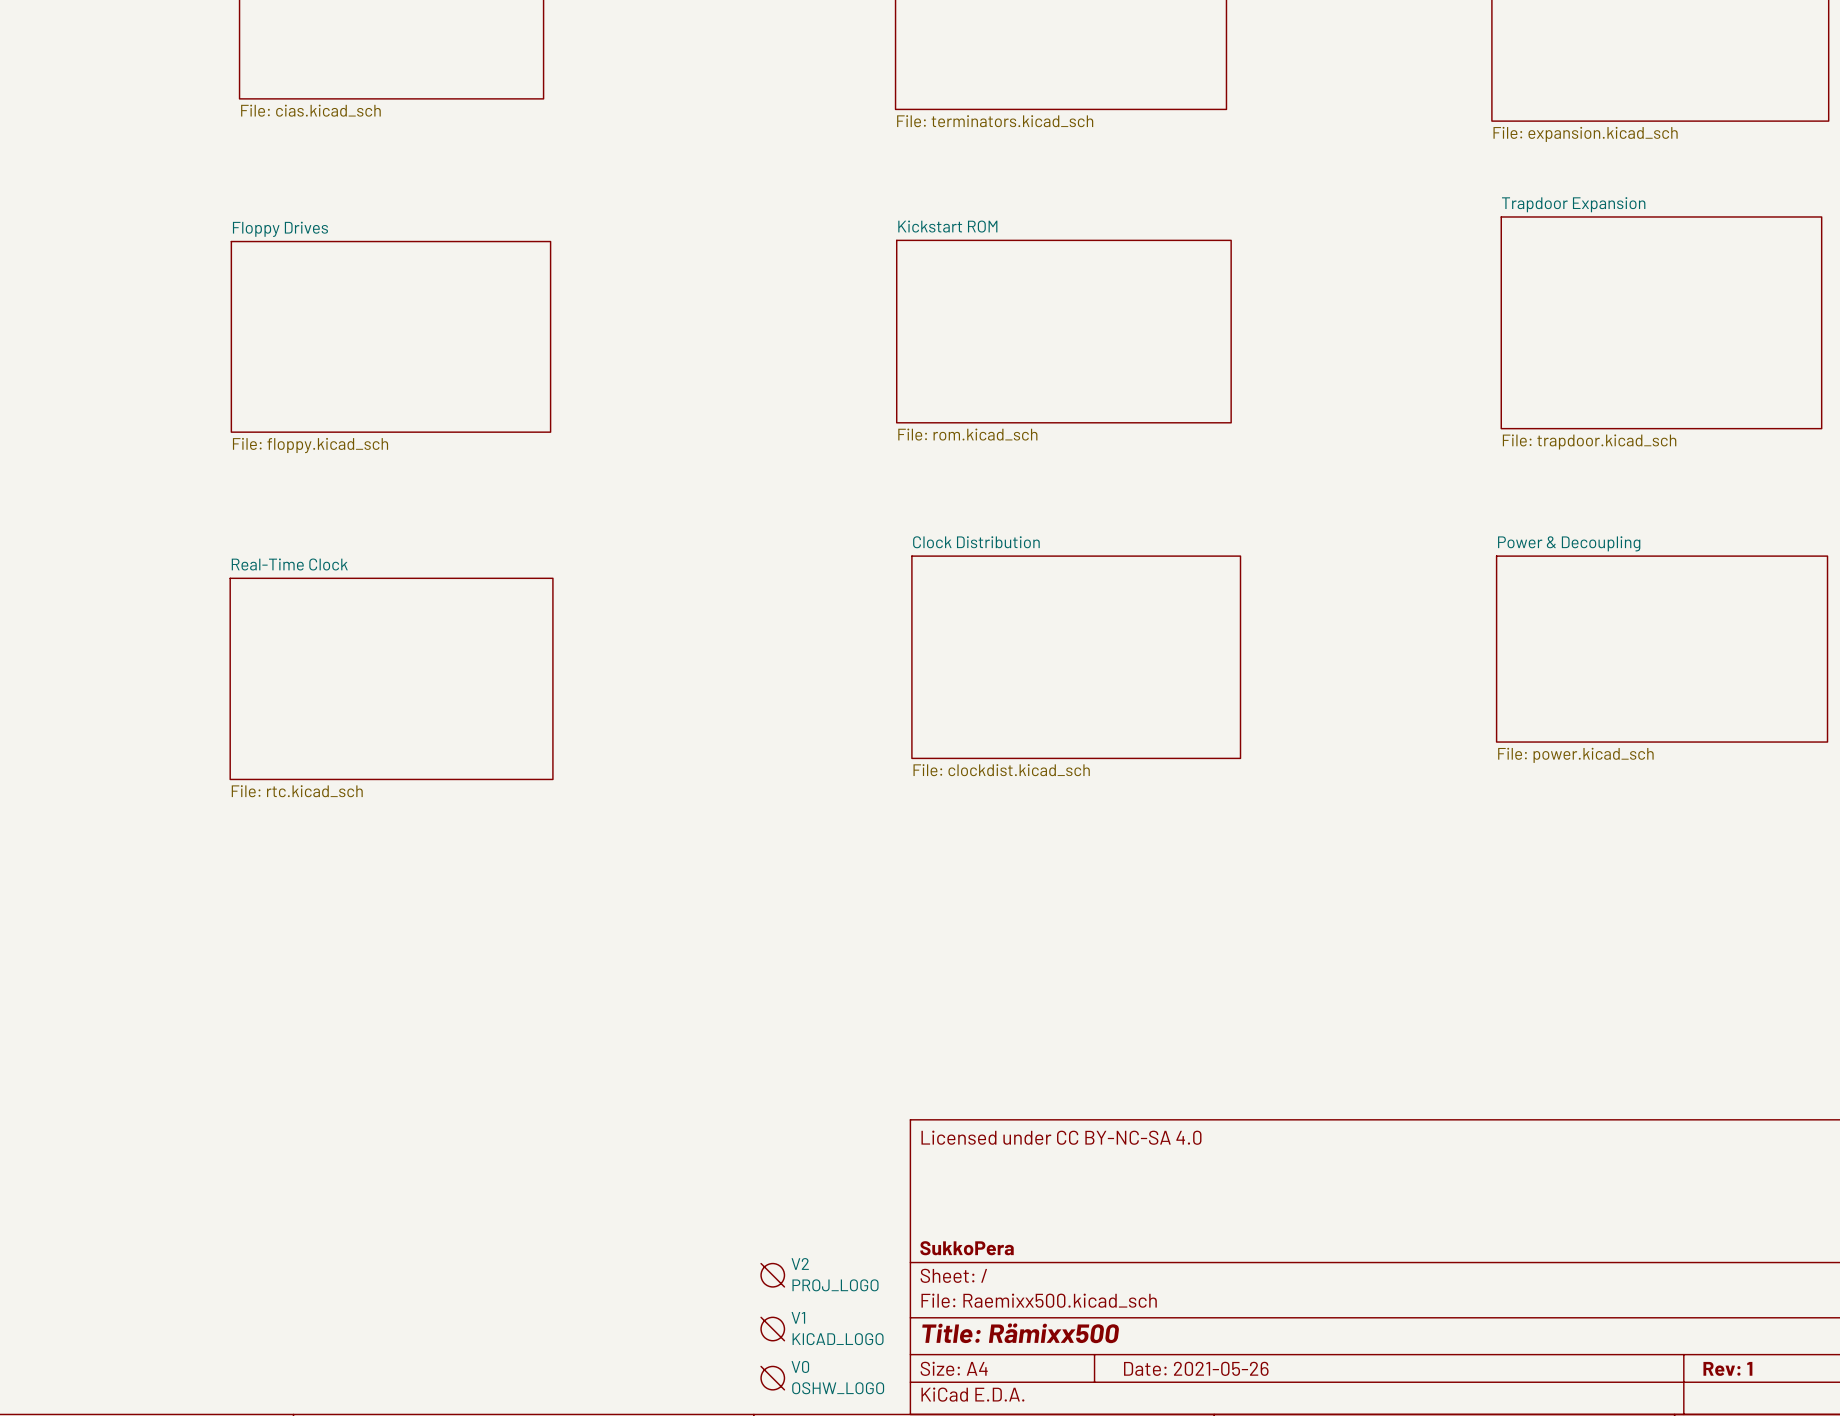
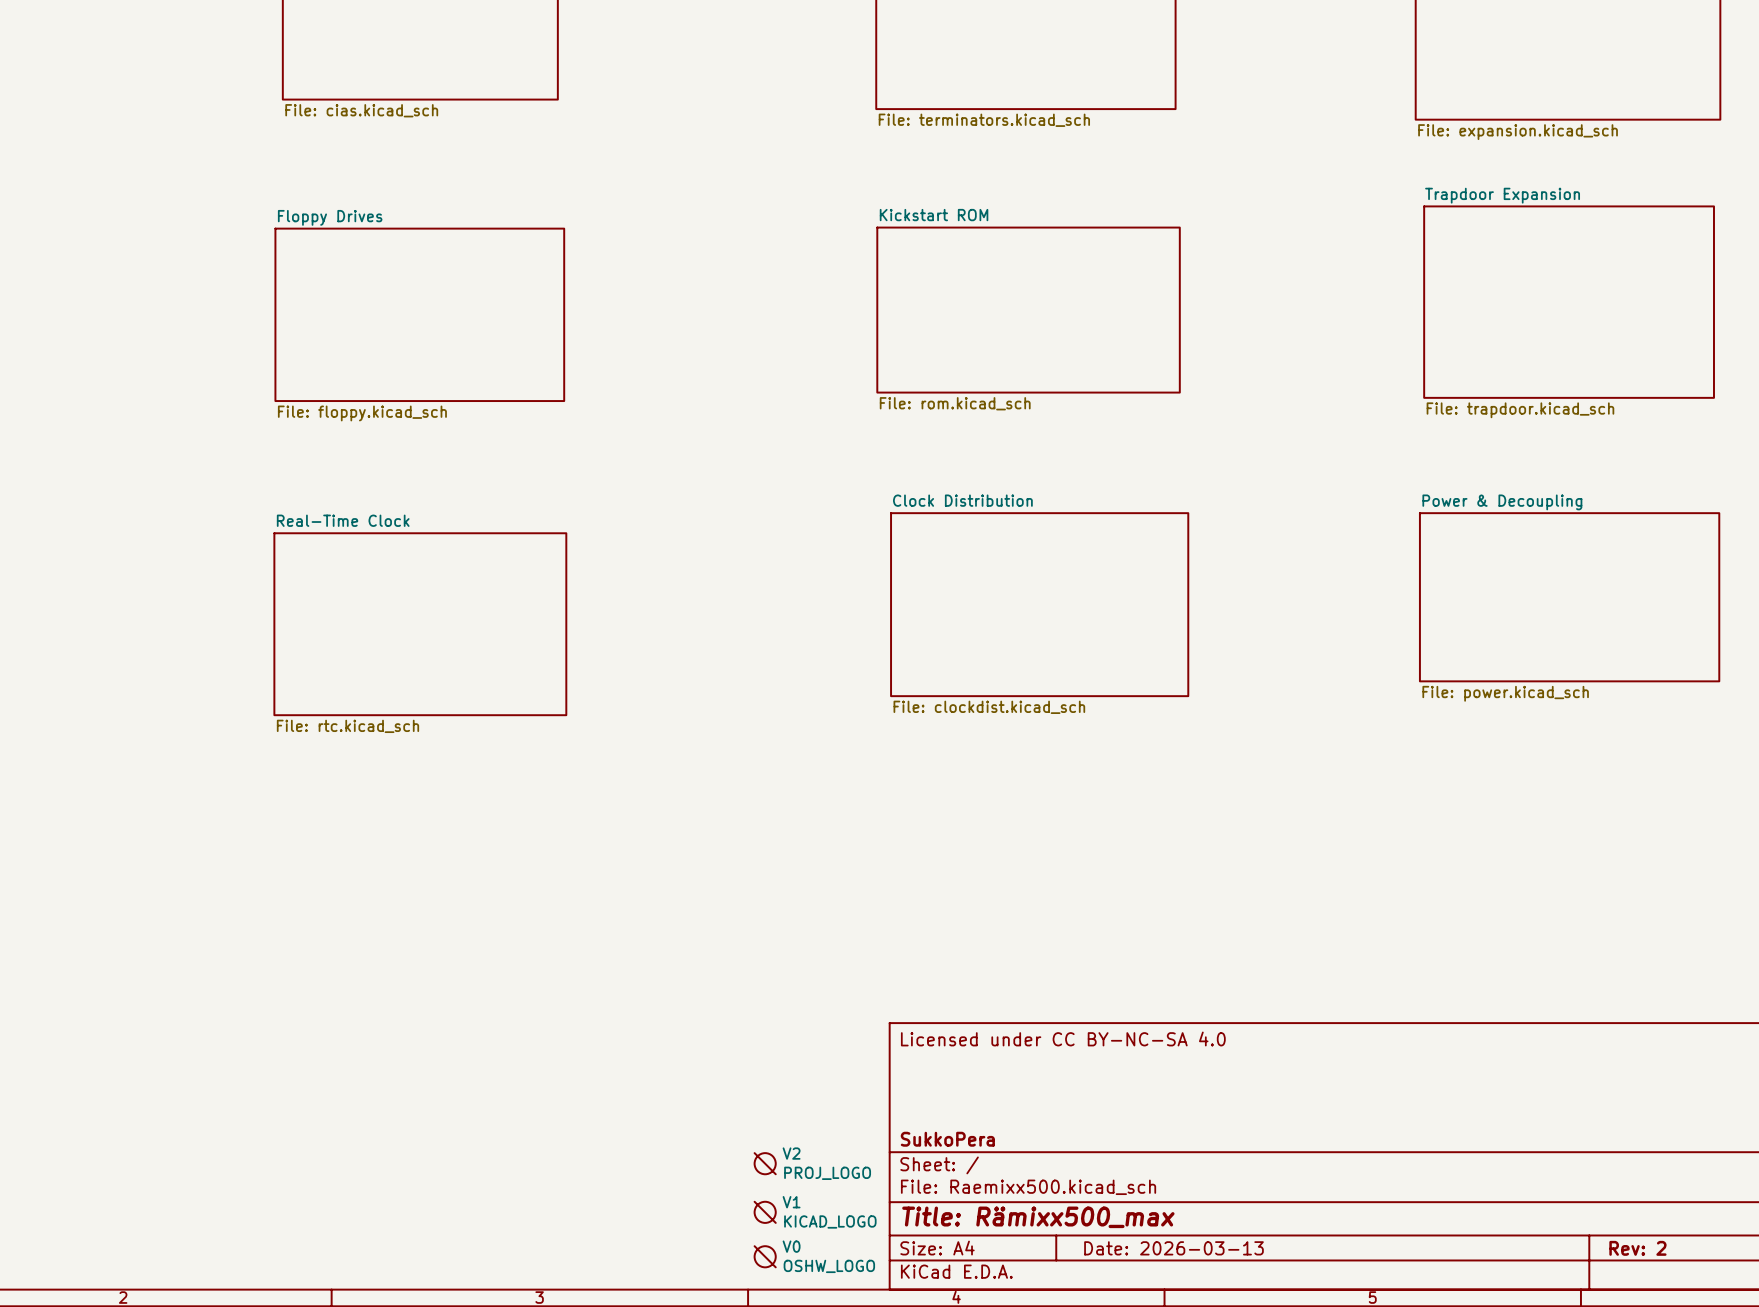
title block: Title: Rämixx500 (1020, 1333) -> Title: Rämixx500_max (1038, 1217)
title block: Date: 2021-05-26 (1196, 1368) -> Date: 2026-03-13 (1173, 1248)
title block: Rev: 1 (1727, 1368) -> Rev: 2 (1637, 1248)

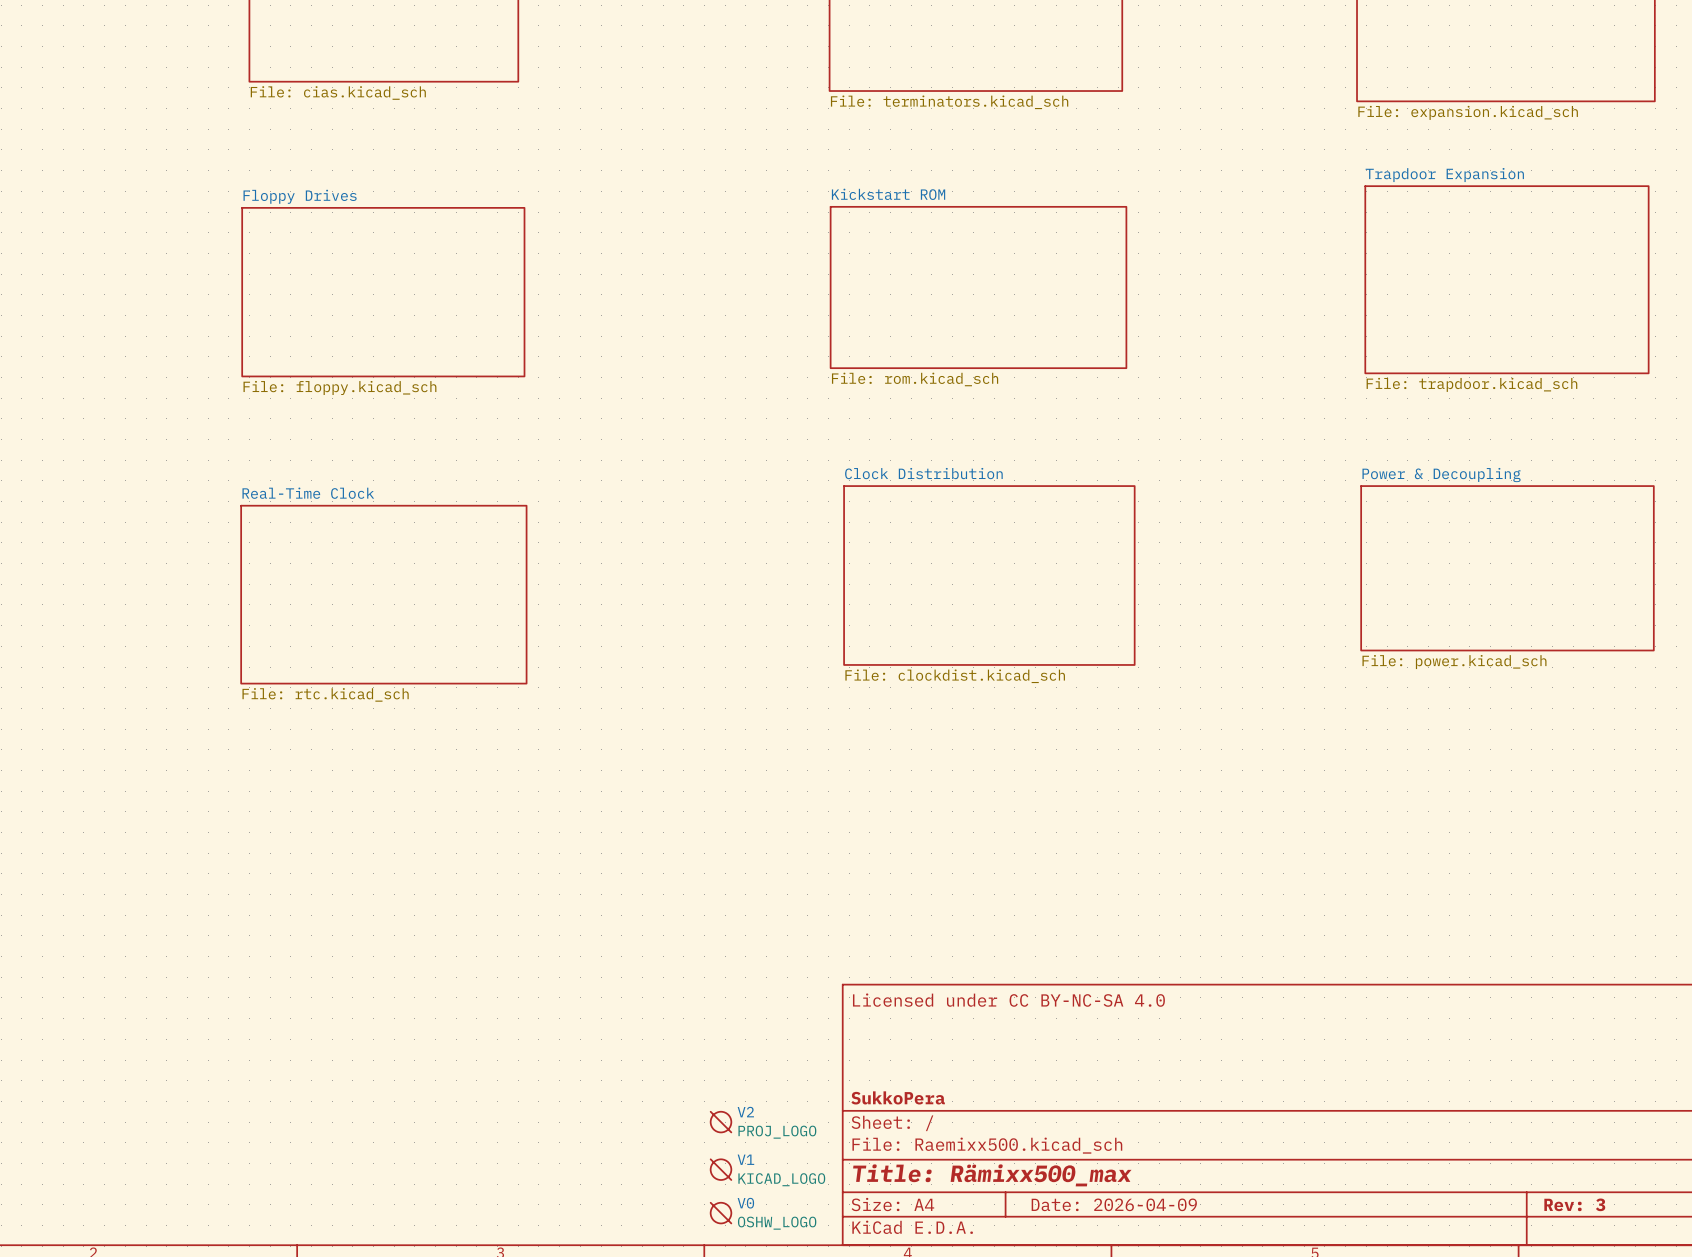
title block: Date: 2026-03-13 (1173, 1248) -> Date: 2026-04-09 (1114, 1204)
title block: Rev: 2 (1637, 1248) -> Rev: 3 (1574, 1204)

